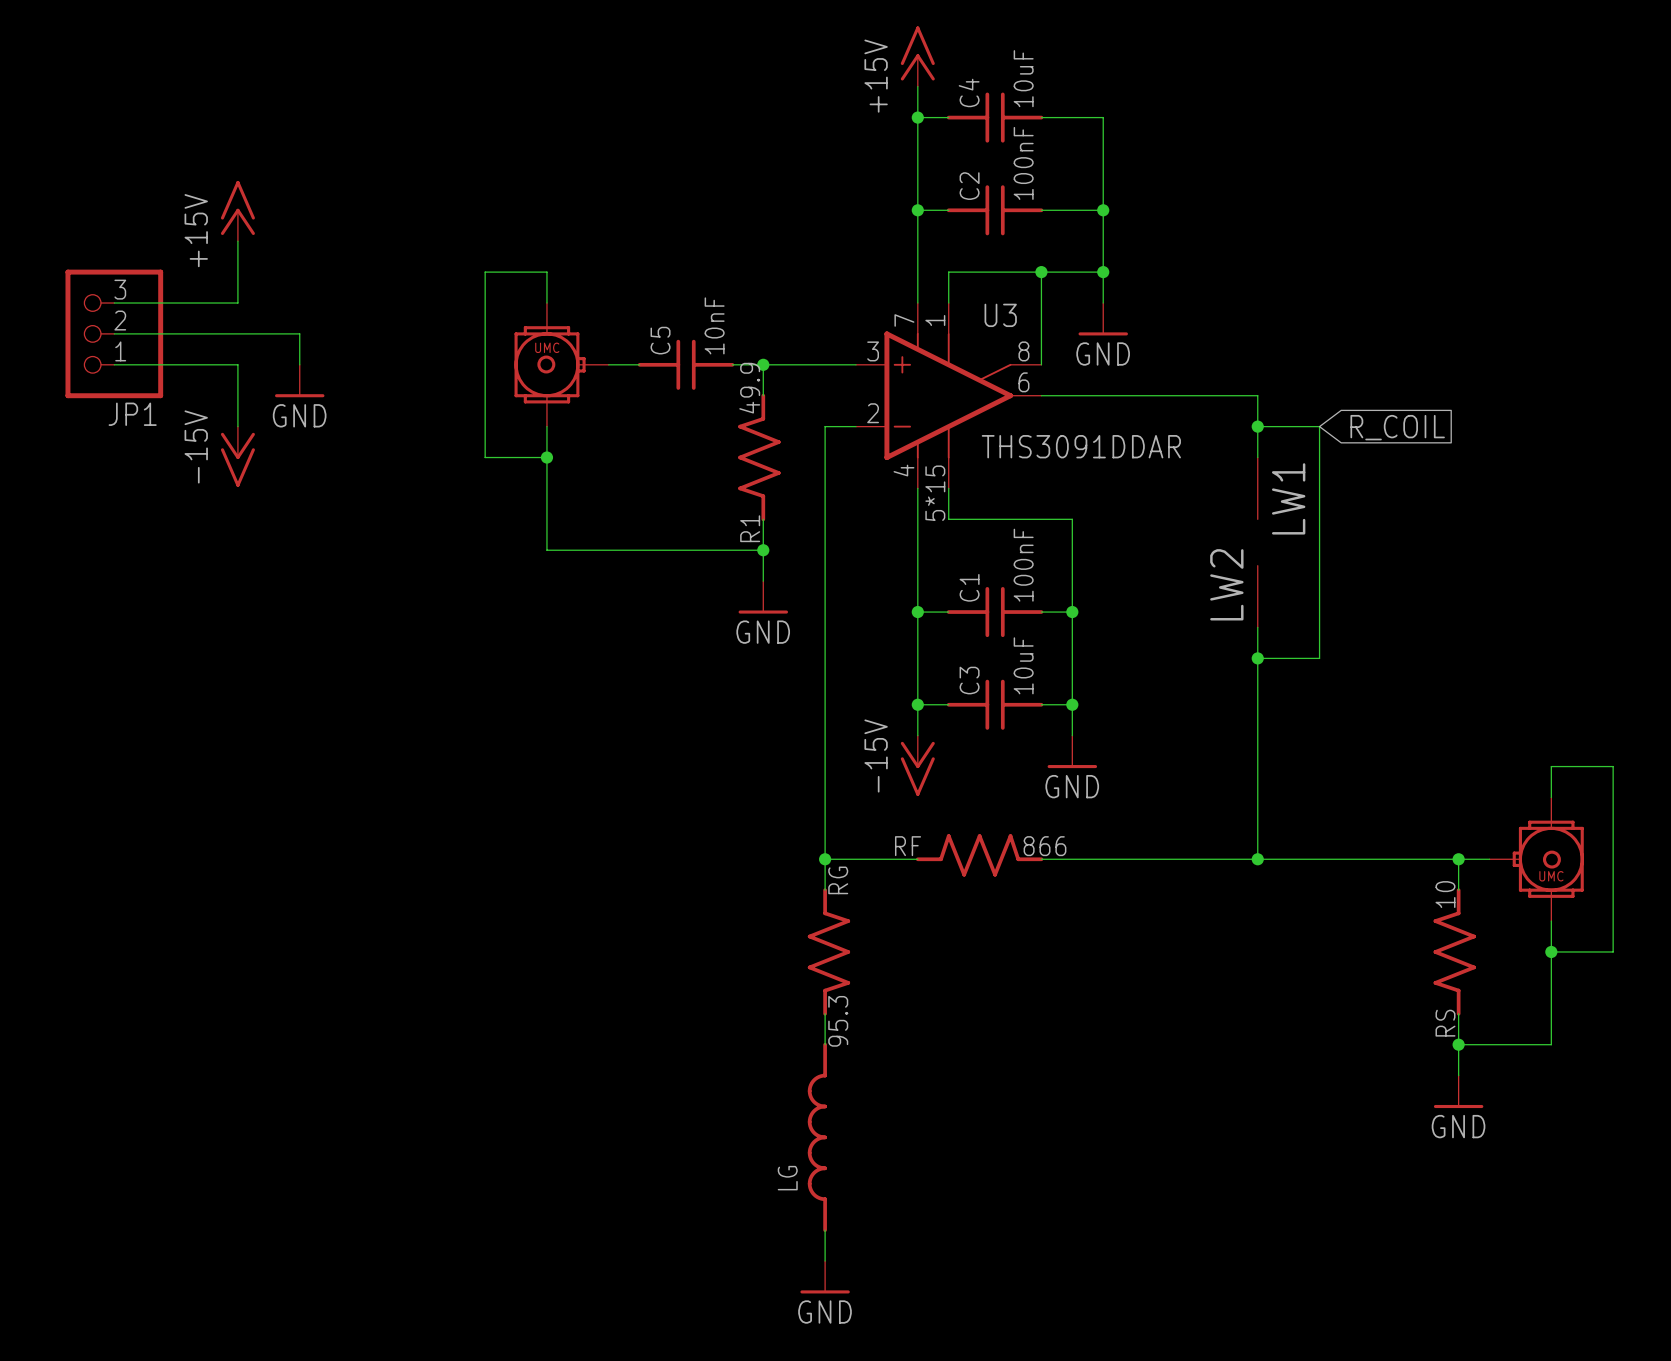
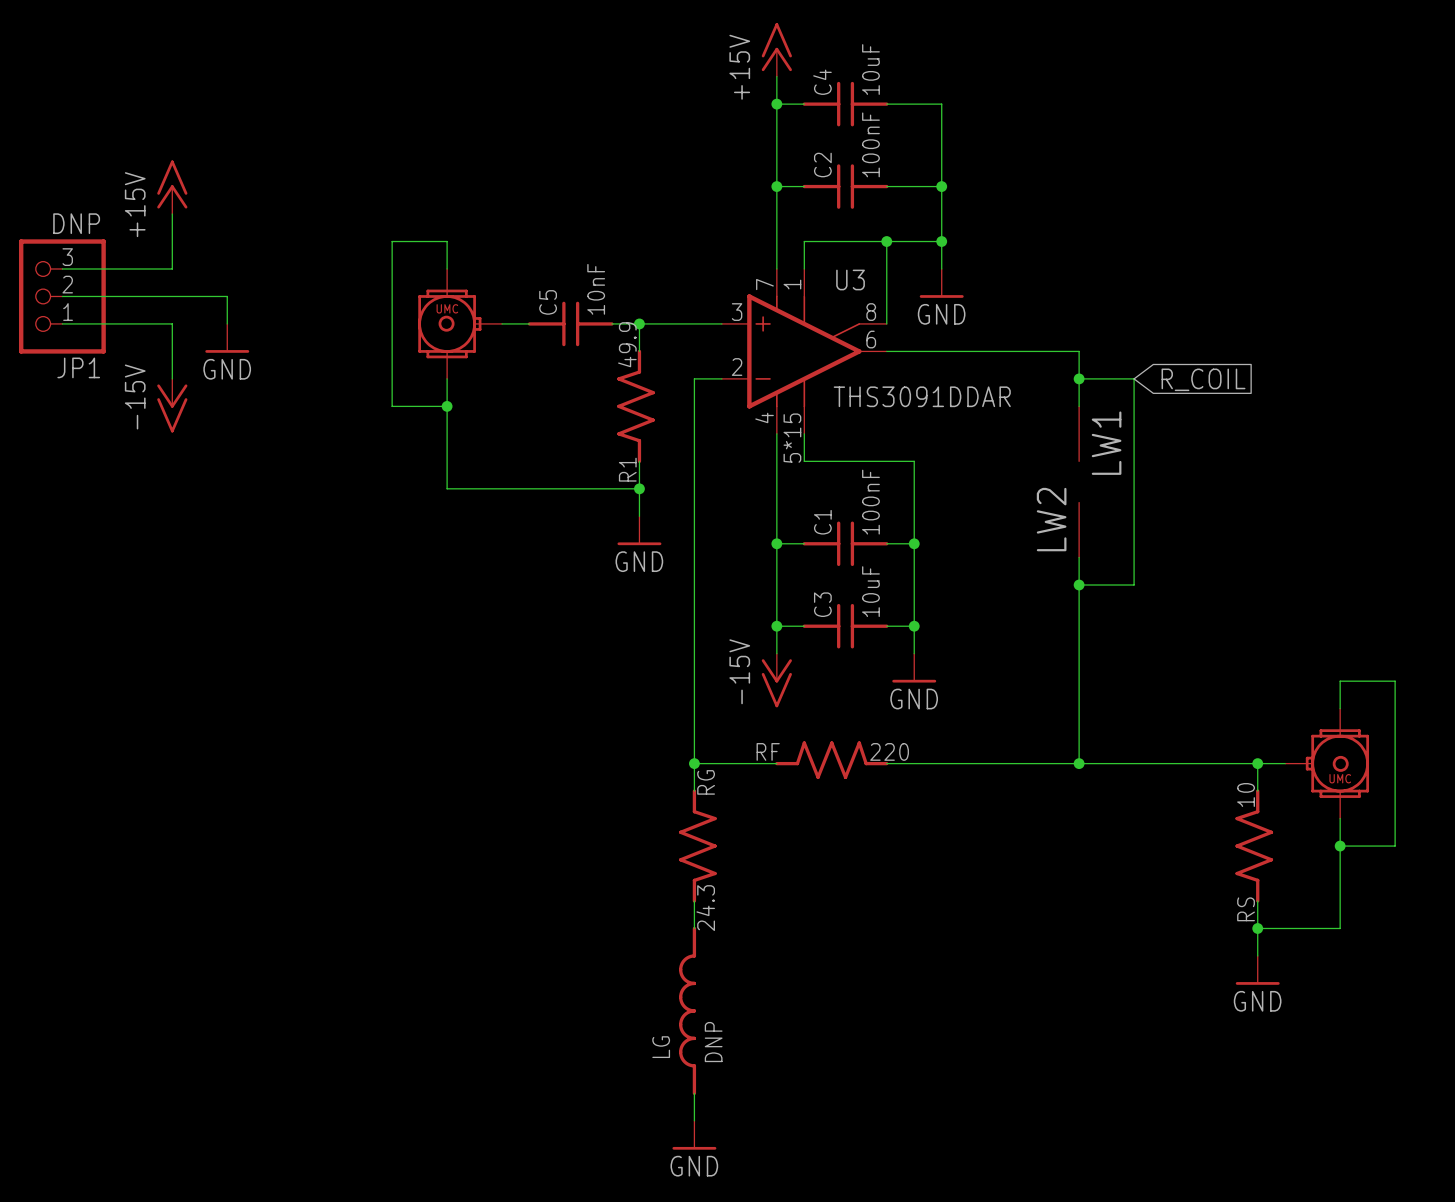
JP1 value: none -> DNP (76, 223)
RF value: 866 (1045, 846) -> 220 (889, 751)
RG value: 95.3 (838, 1021) -> 24.3 (705, 908)
LG value: none -> DNP (713, 1042)

